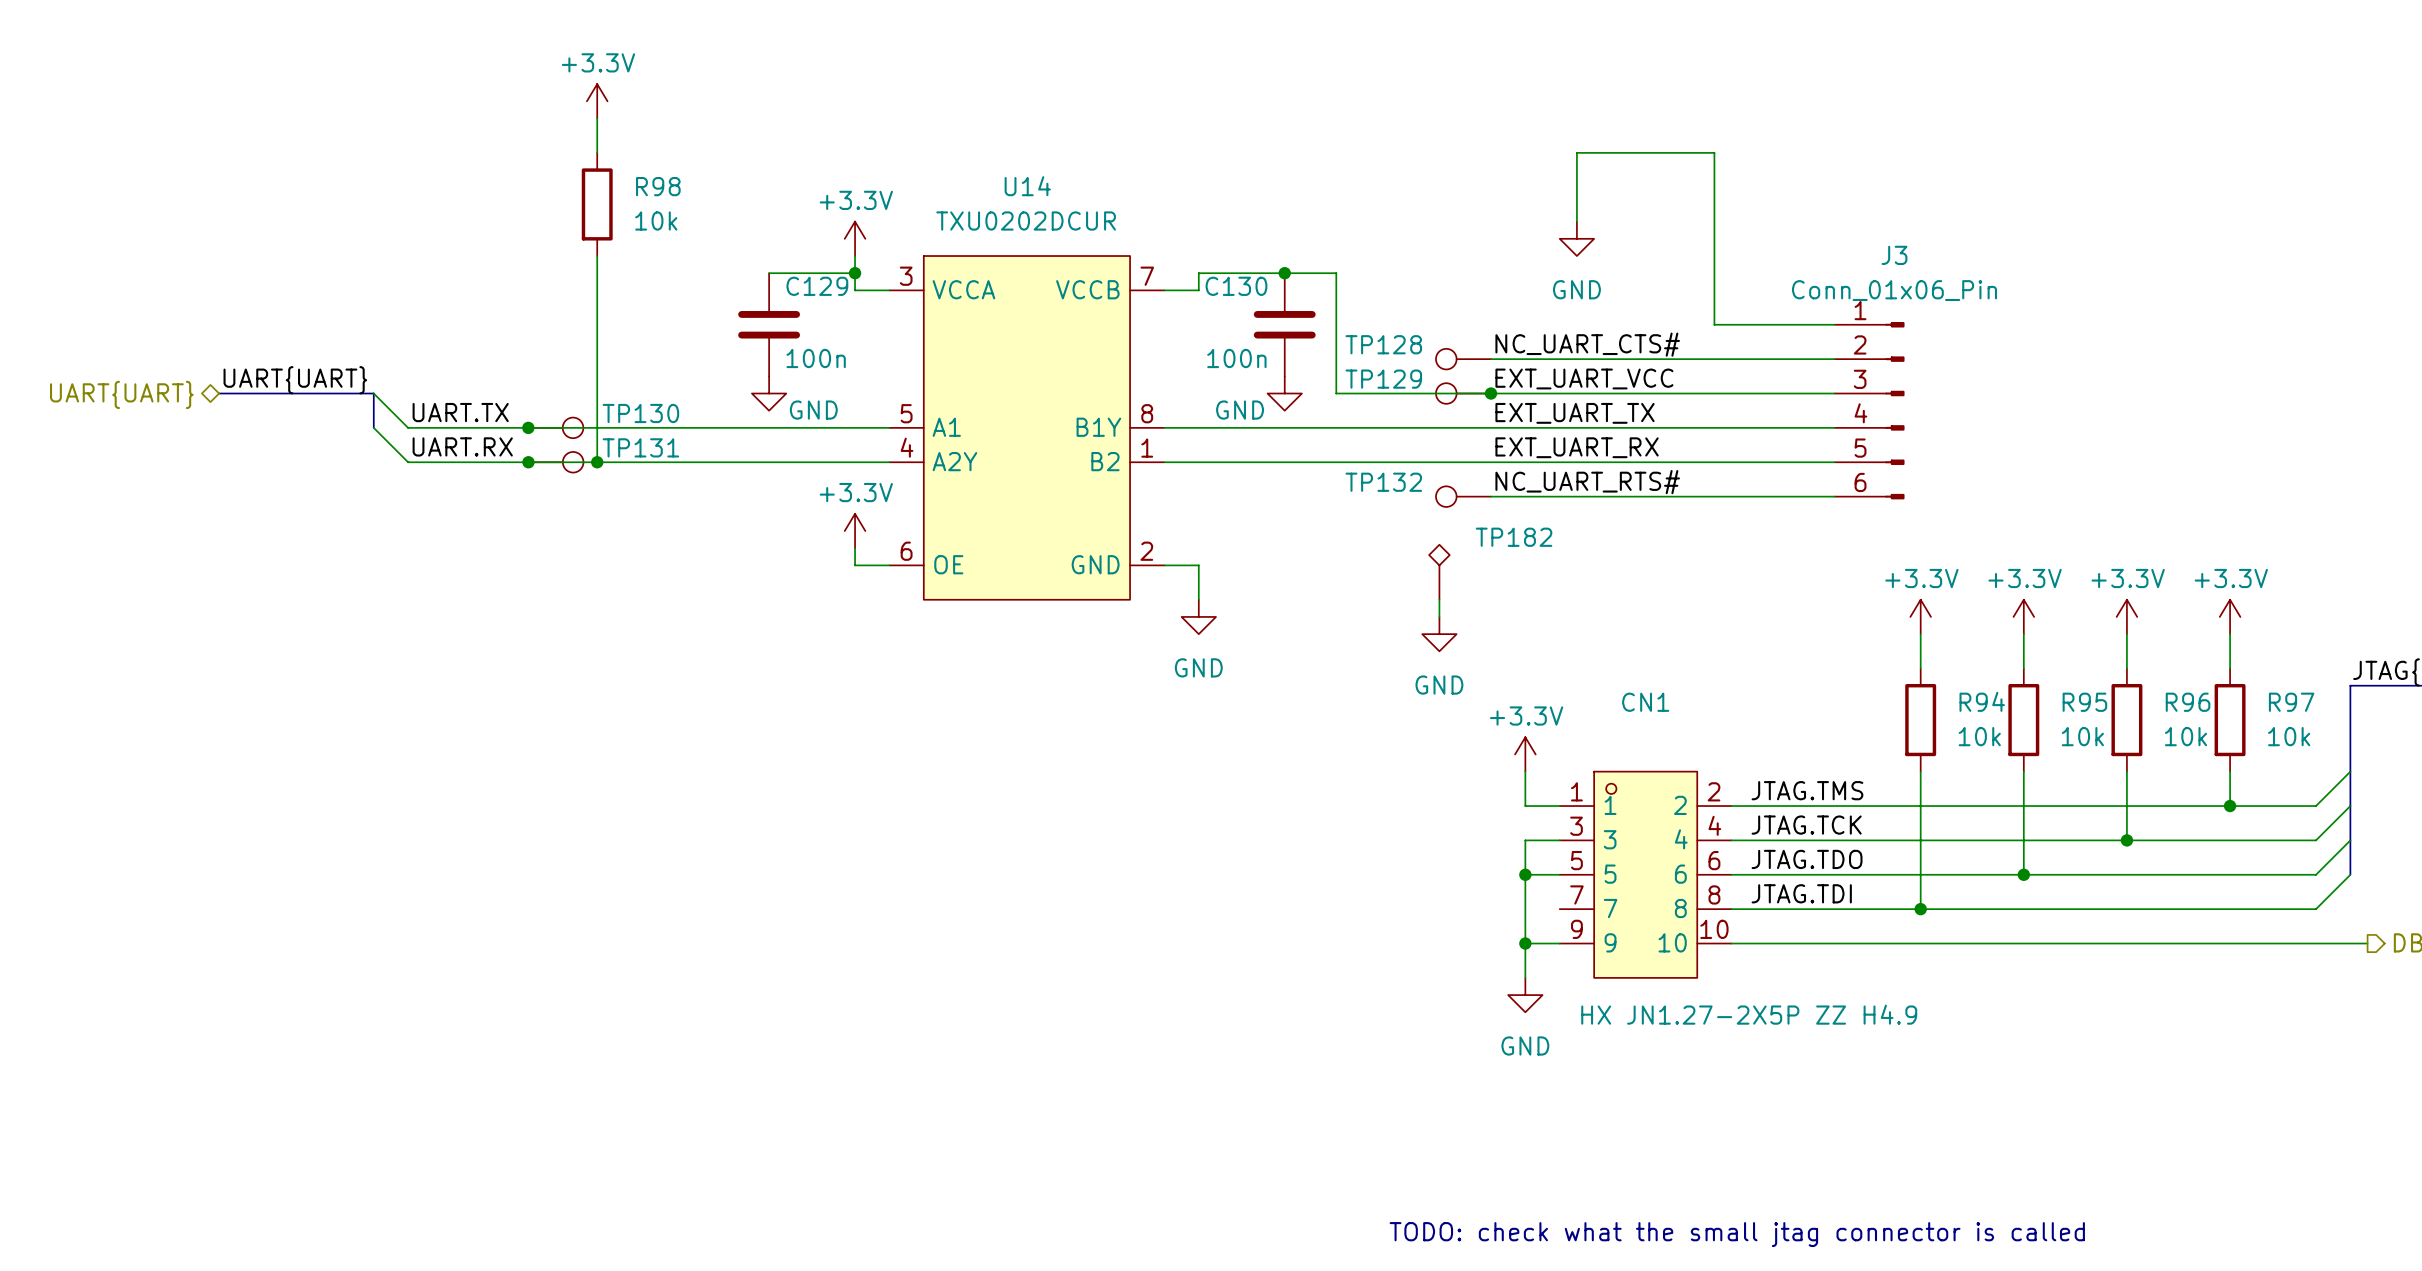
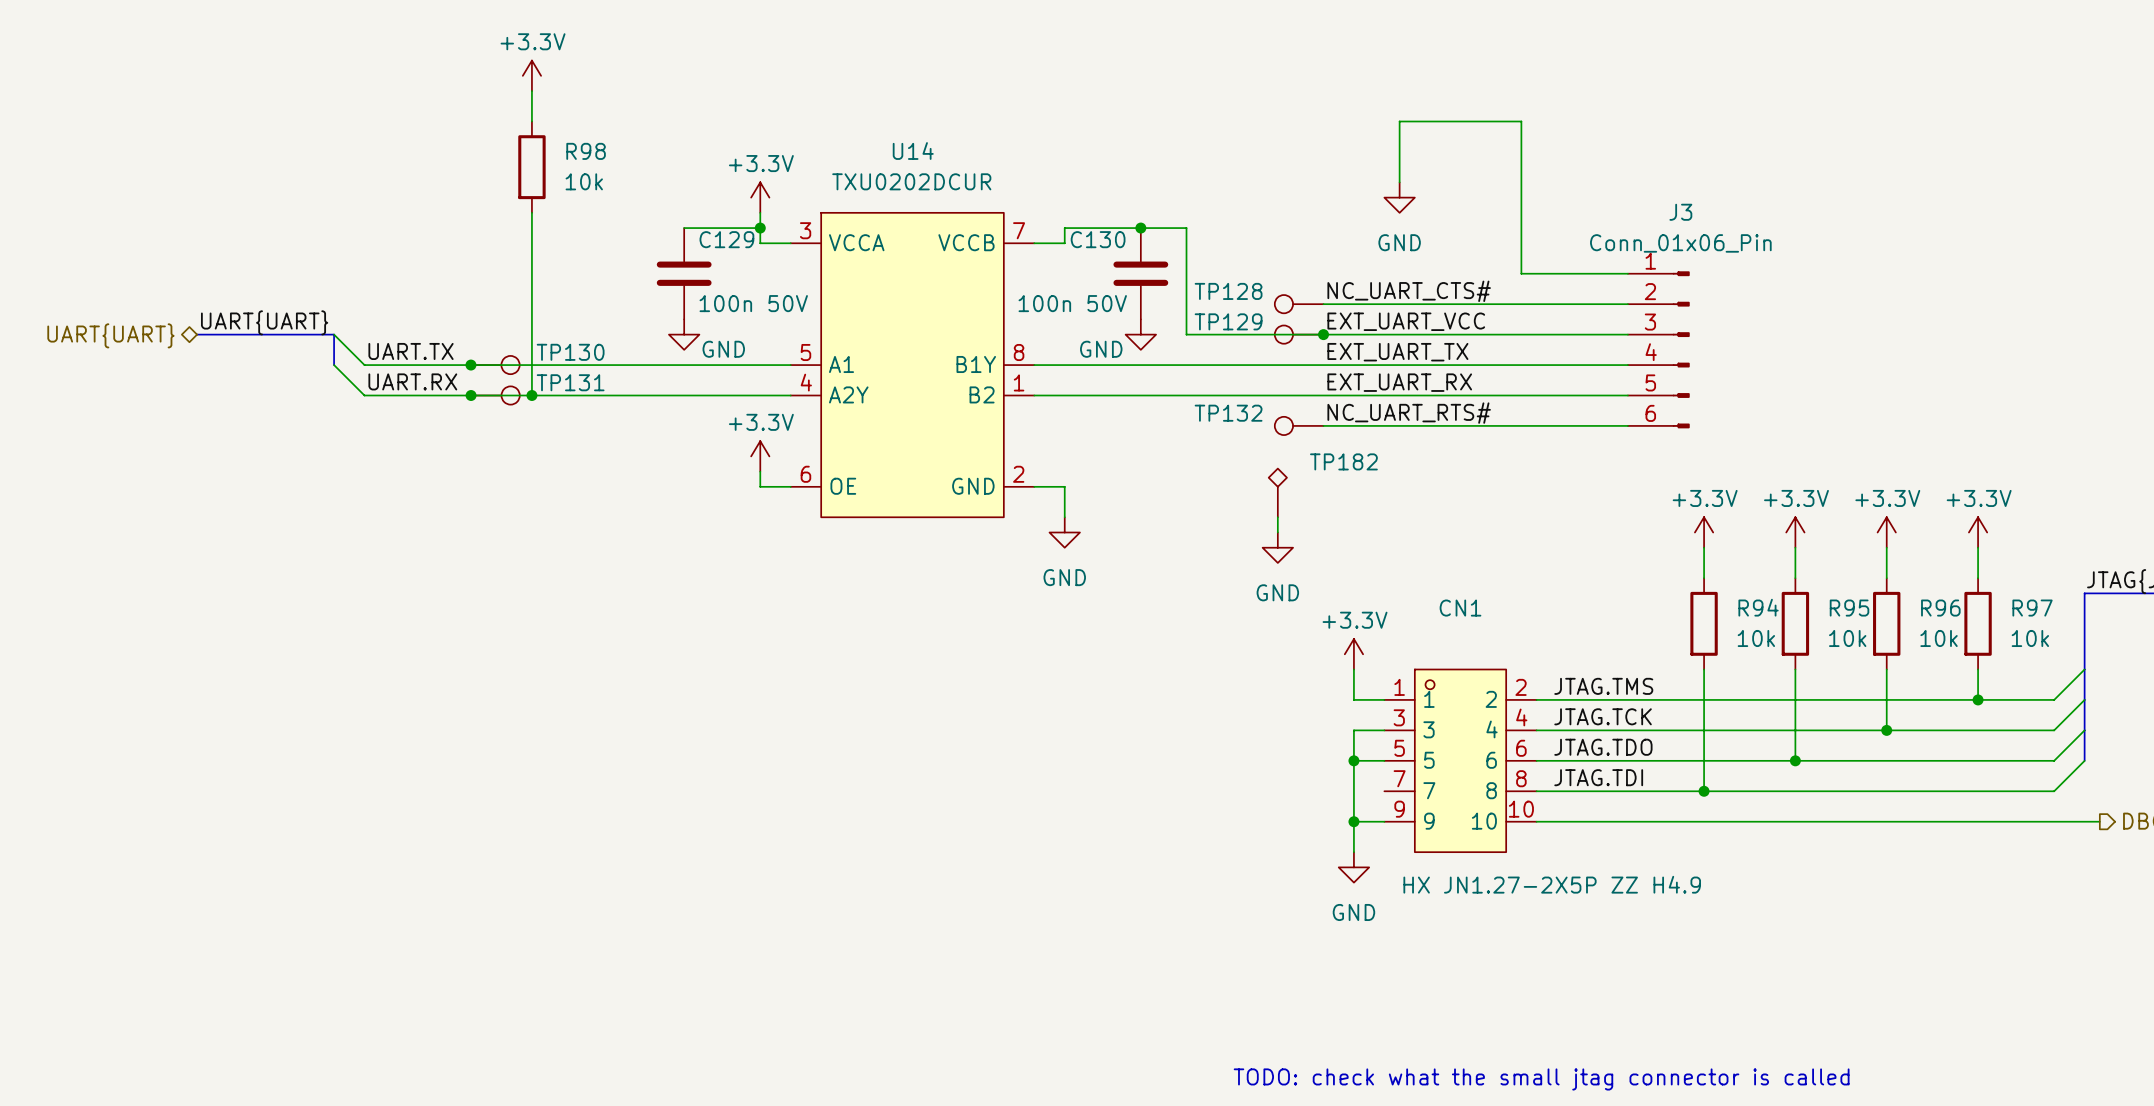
C129 value: 100n (816, 358) -> 100n 50V (753, 303)
C130 value: 100n (1236, 358) -> 100n 50V (1072, 303)

